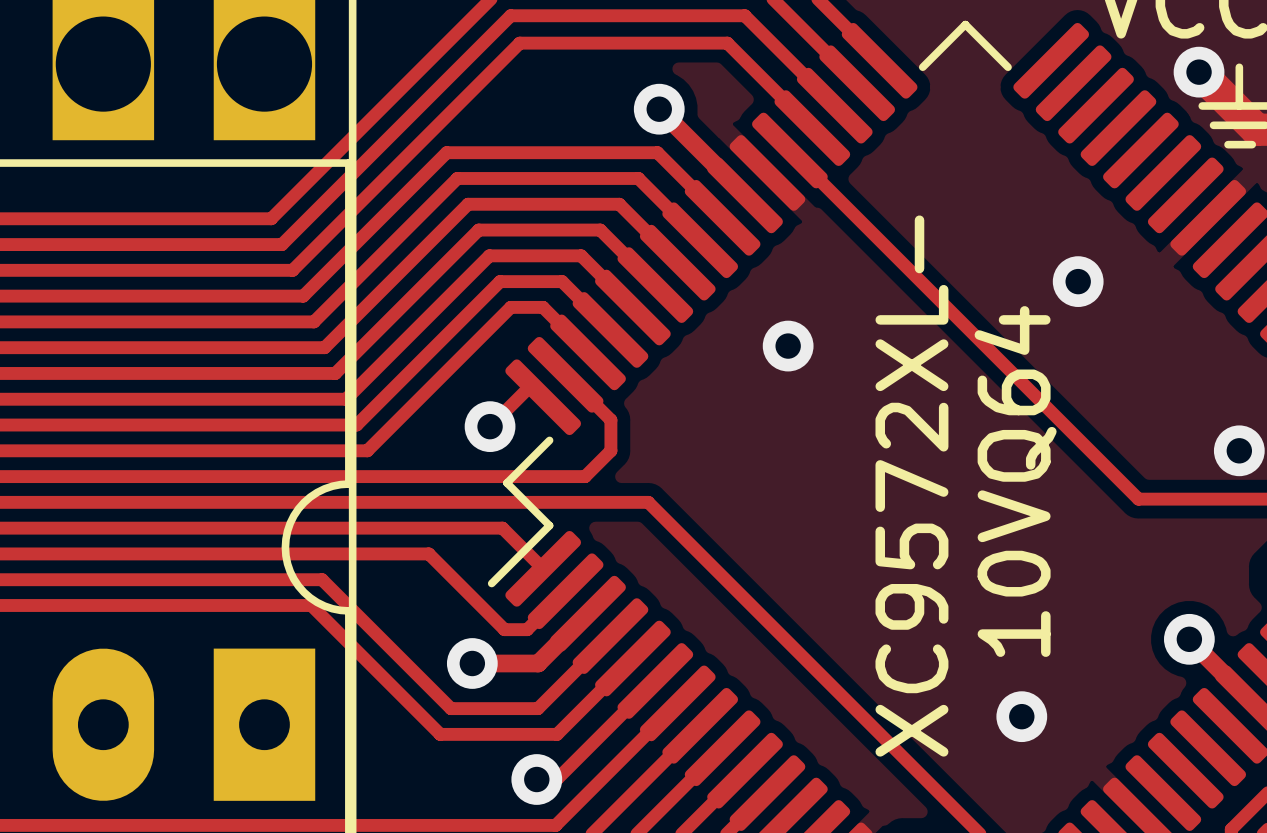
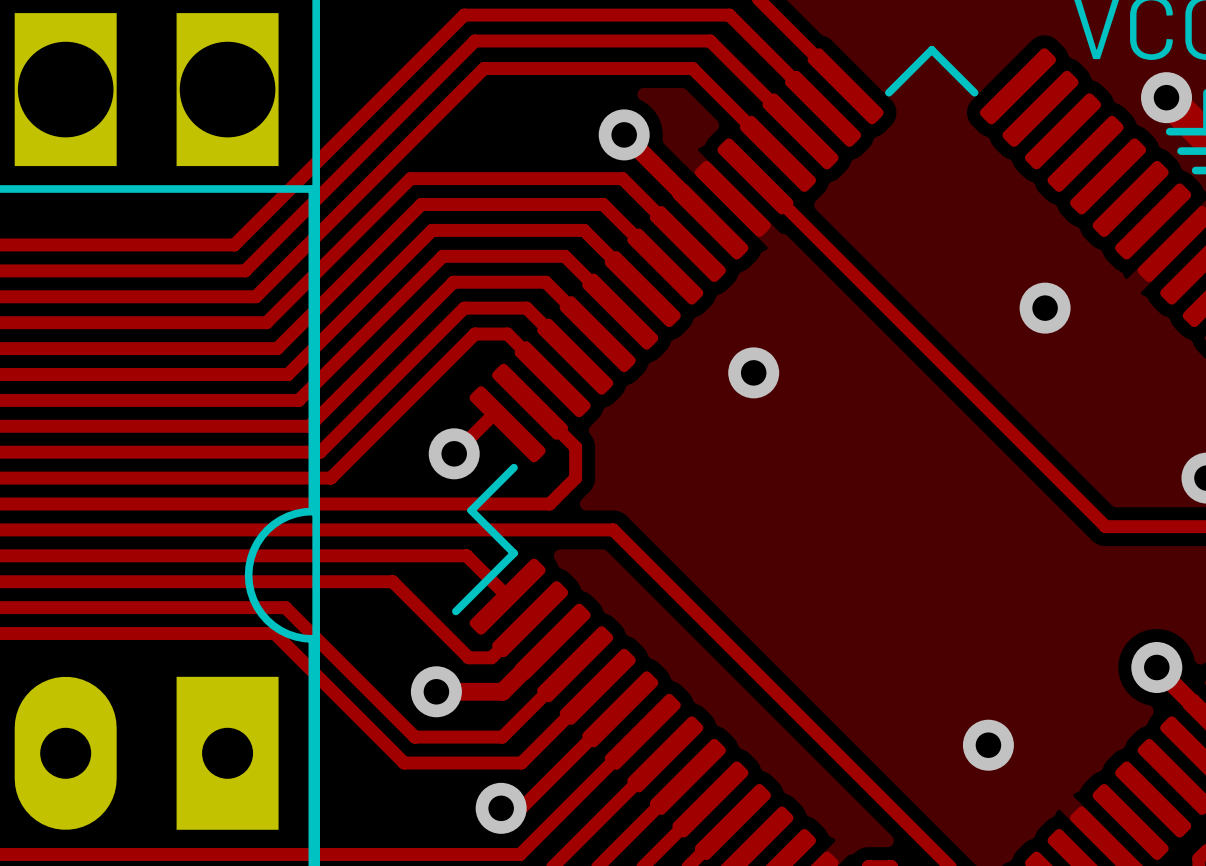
text: 10VQ64 (1015, 481) -> none
text: XC9572XL- (911, 486) -> none

